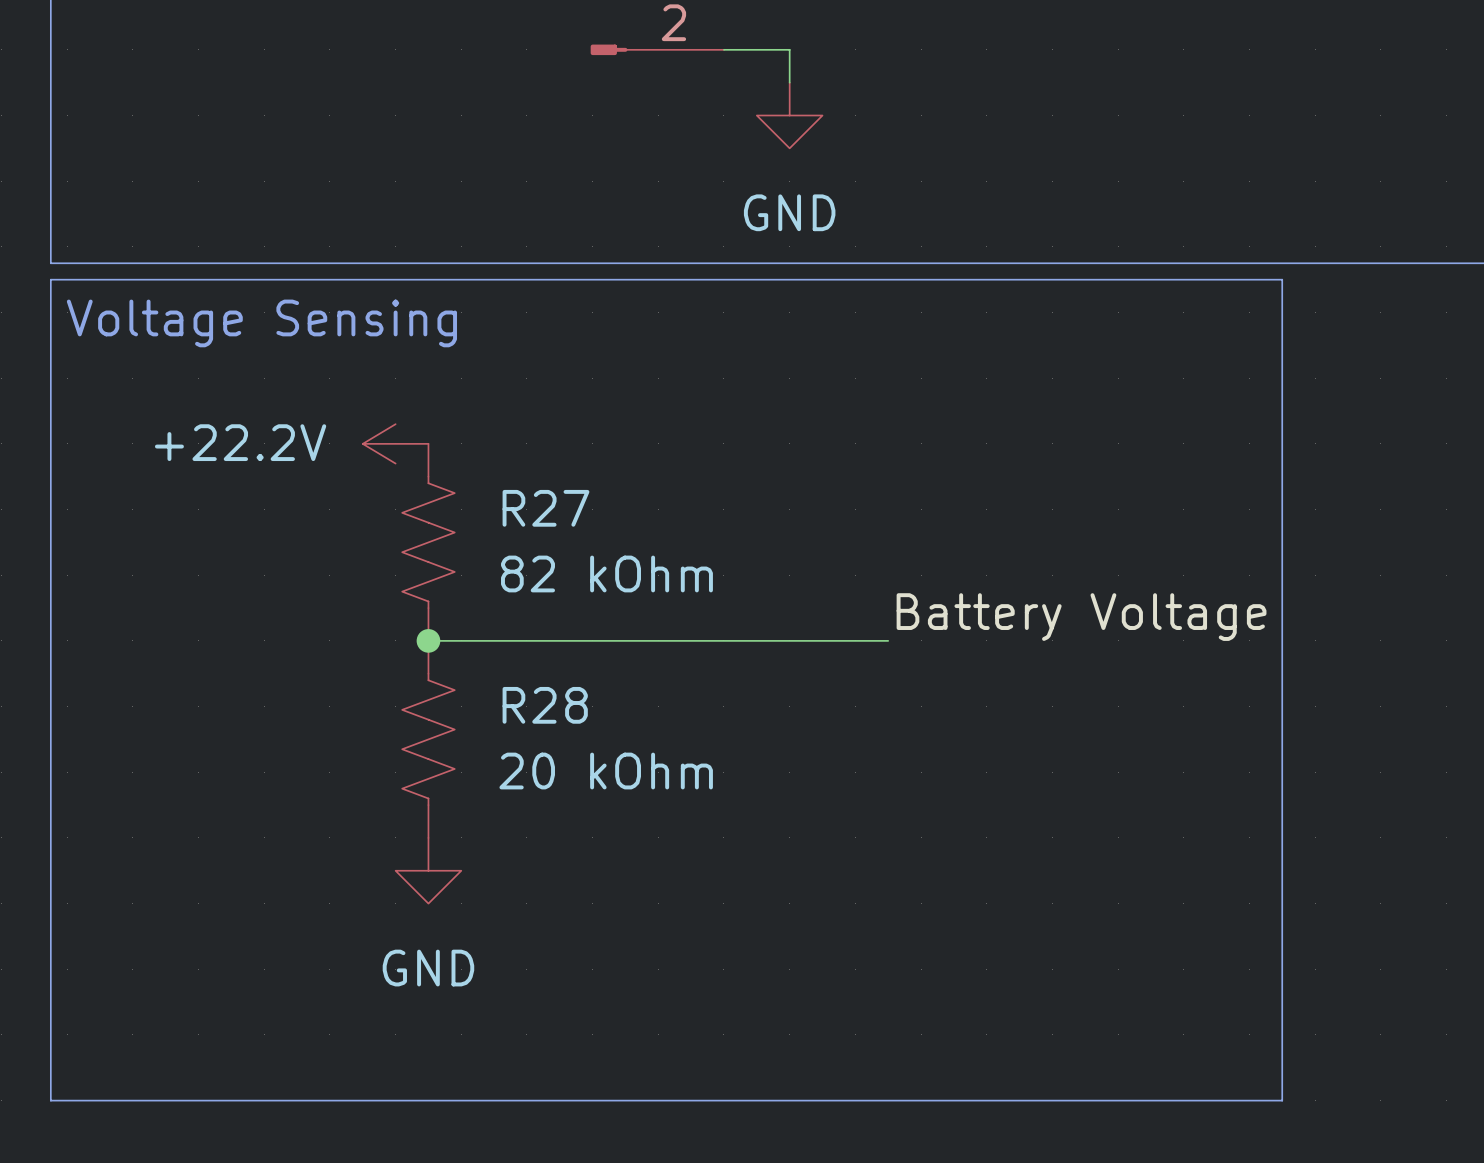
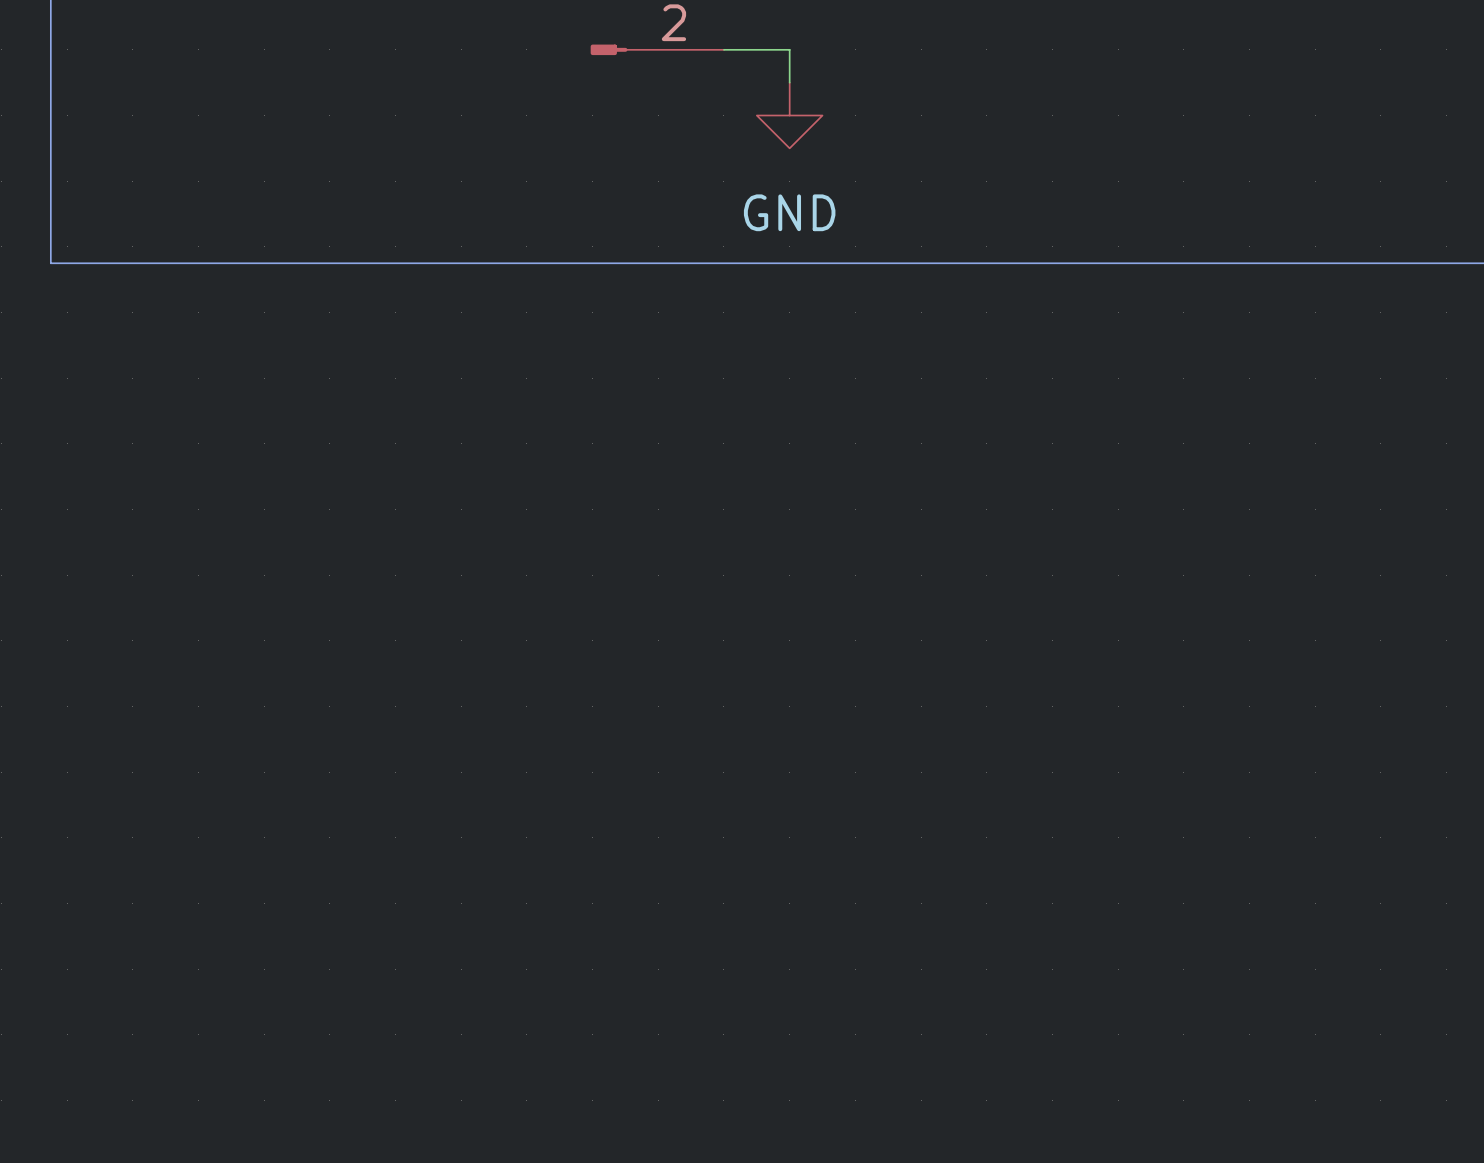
line: (50, 279) (50, 1100) (1282, 1100) (1282, 279) (50, 279) -> none
text: Voltage Sensing (261, 323) -> none
power symbol: +22.2V (395, 443) -> none
R27: 82 kOhm (428, 542) -> none
label: Battery Voltage (1081, 617) -> none
wire: (428, 640) (888, 640) -> none
junction: (428, 640) -> none
R28: 20 kOhm (428, 739) -> none
power symbol: GND (428, 870) -> none

